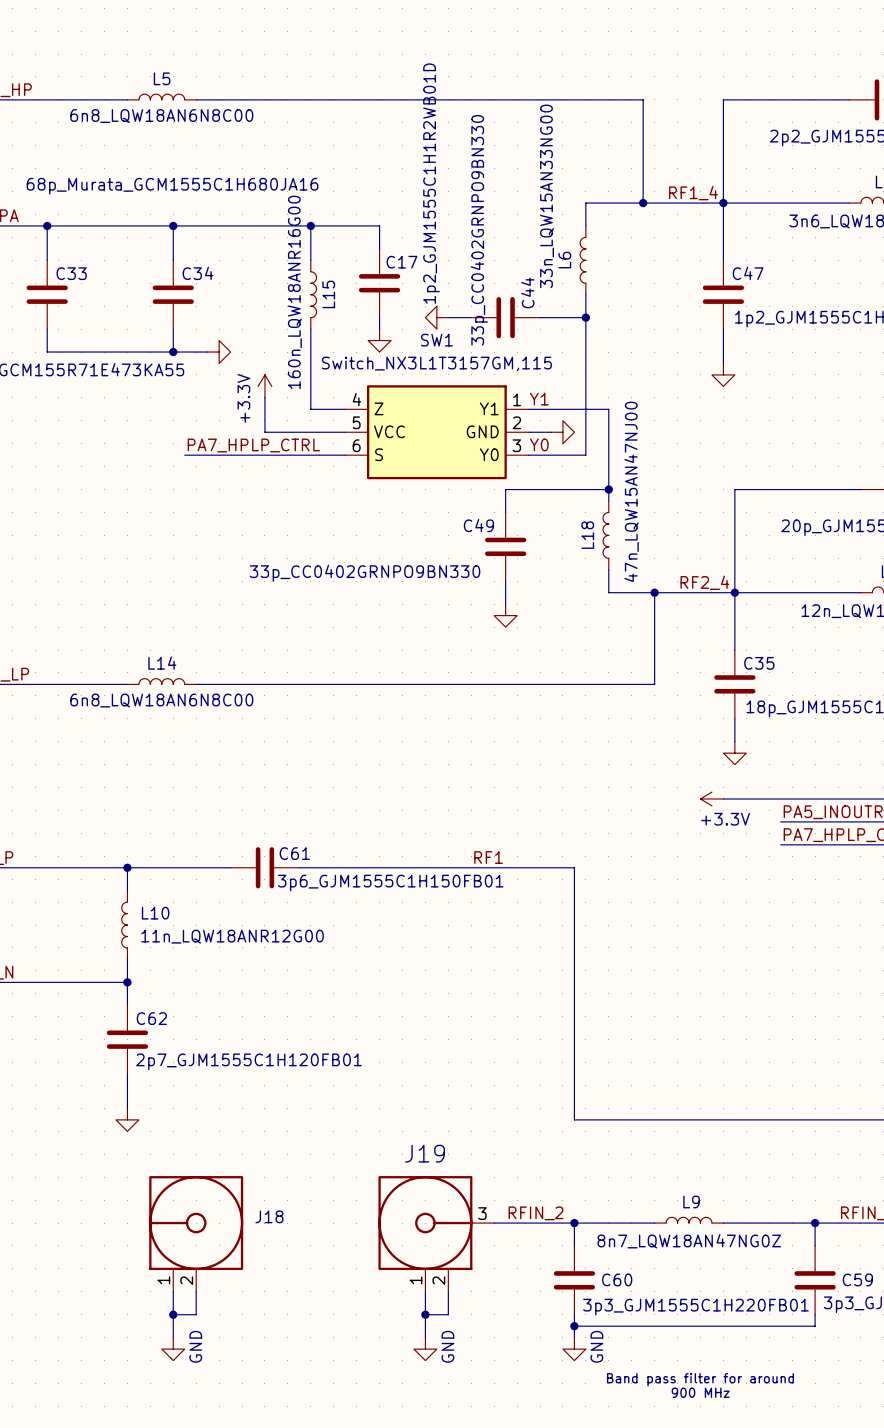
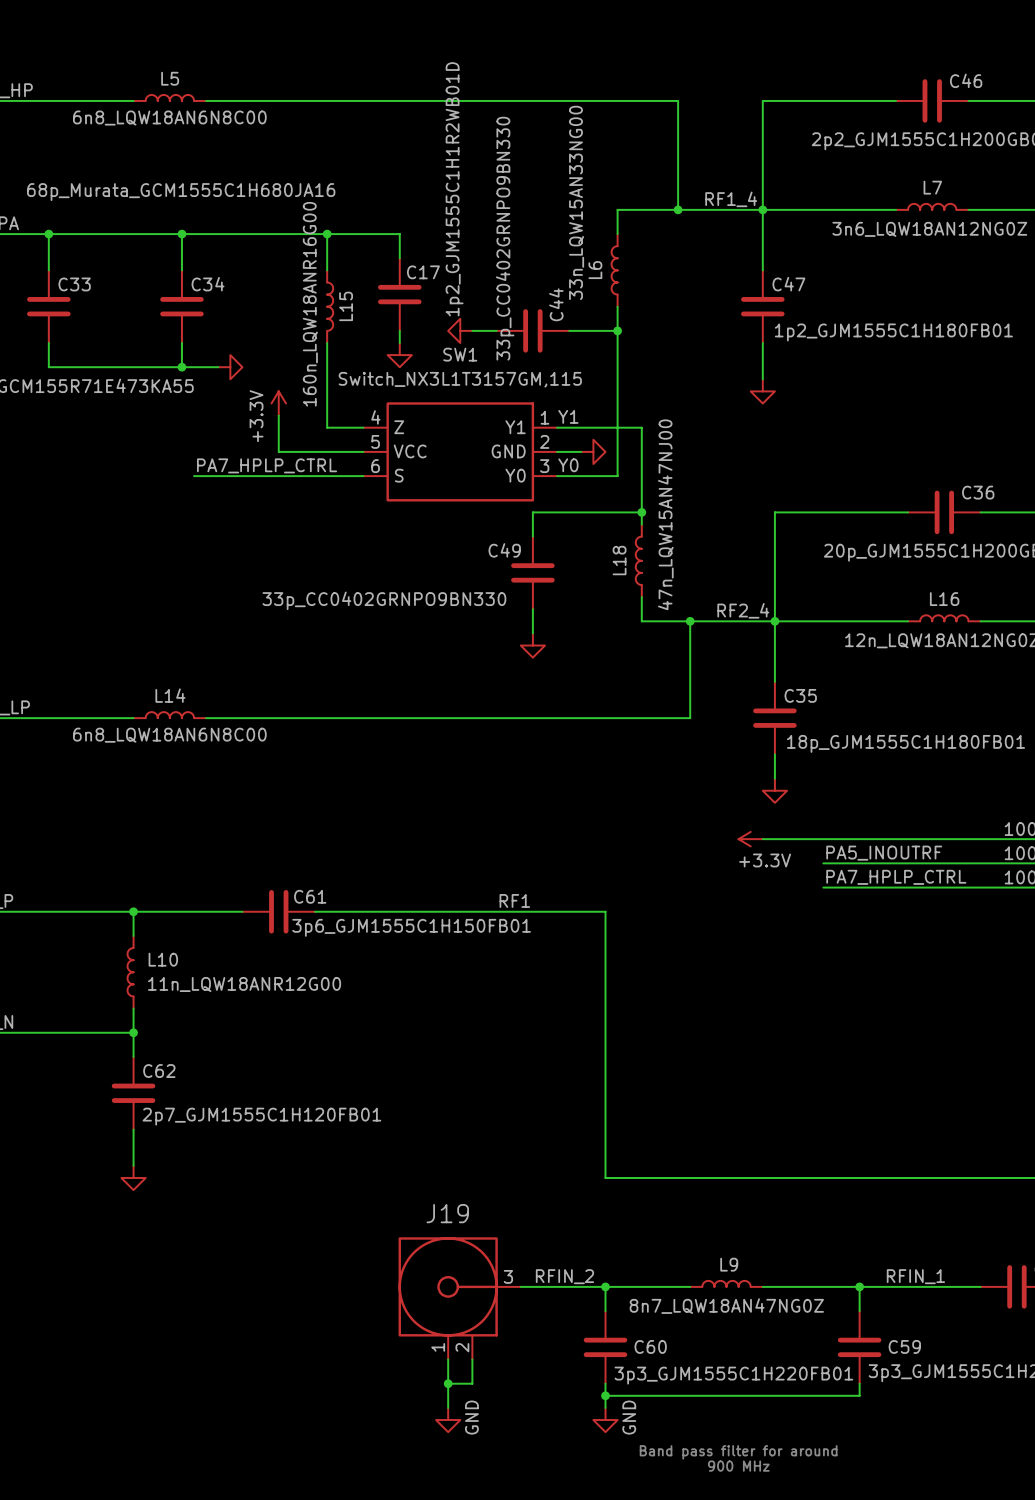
J18: (196, 1233) -> none
wire: (173, 1291) (173, 1337) -> none
wire: (196, 1291) (196, 1314) (173, 1314) -> none
junction: (173, 1314) -> none
power symbol: GND (173, 1349) -> none

